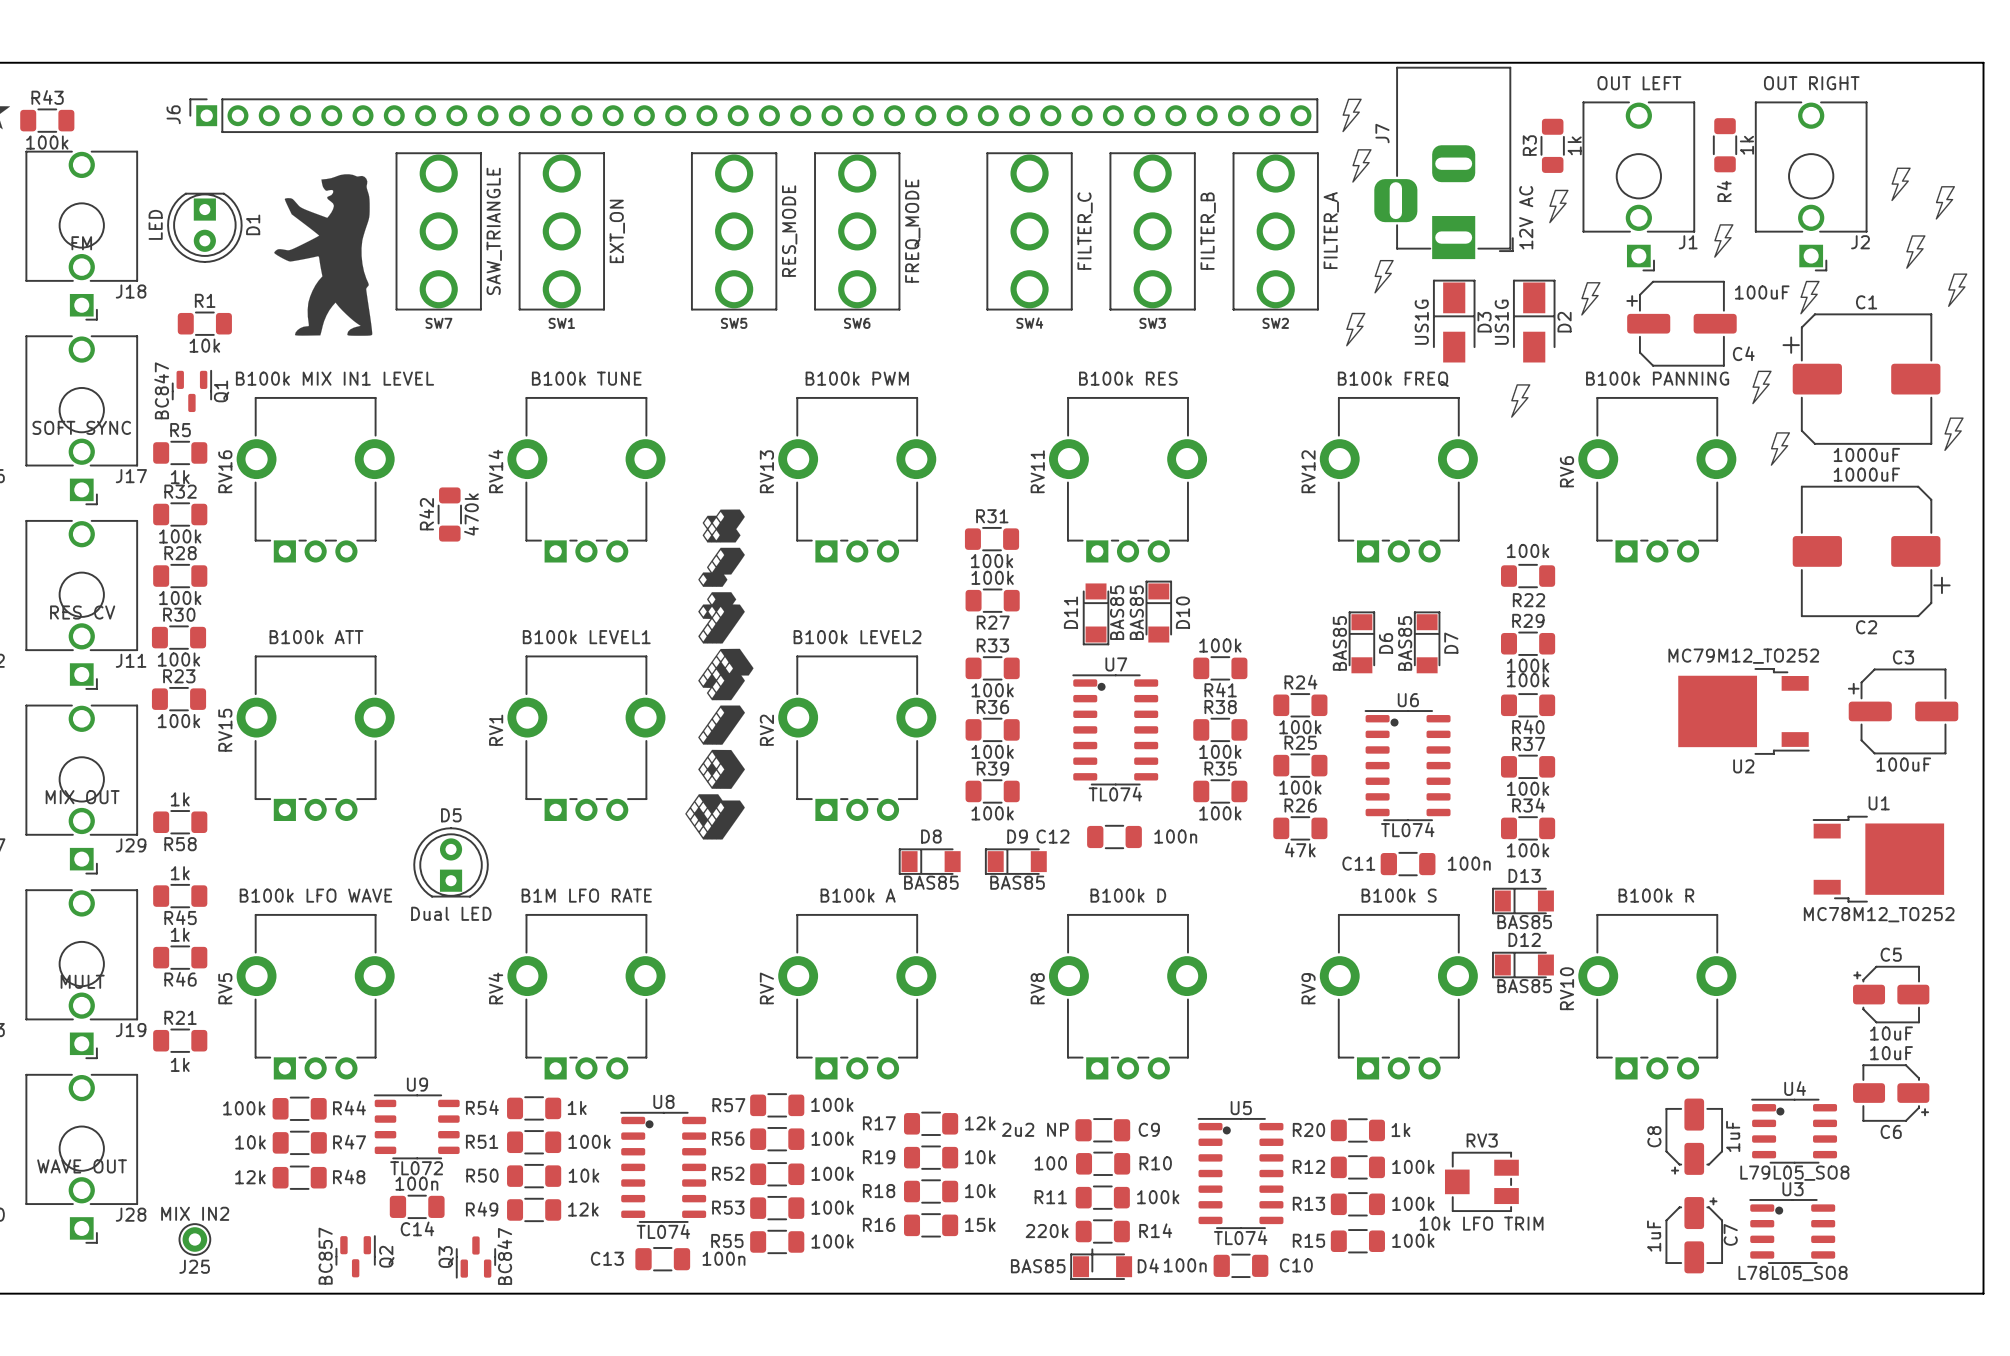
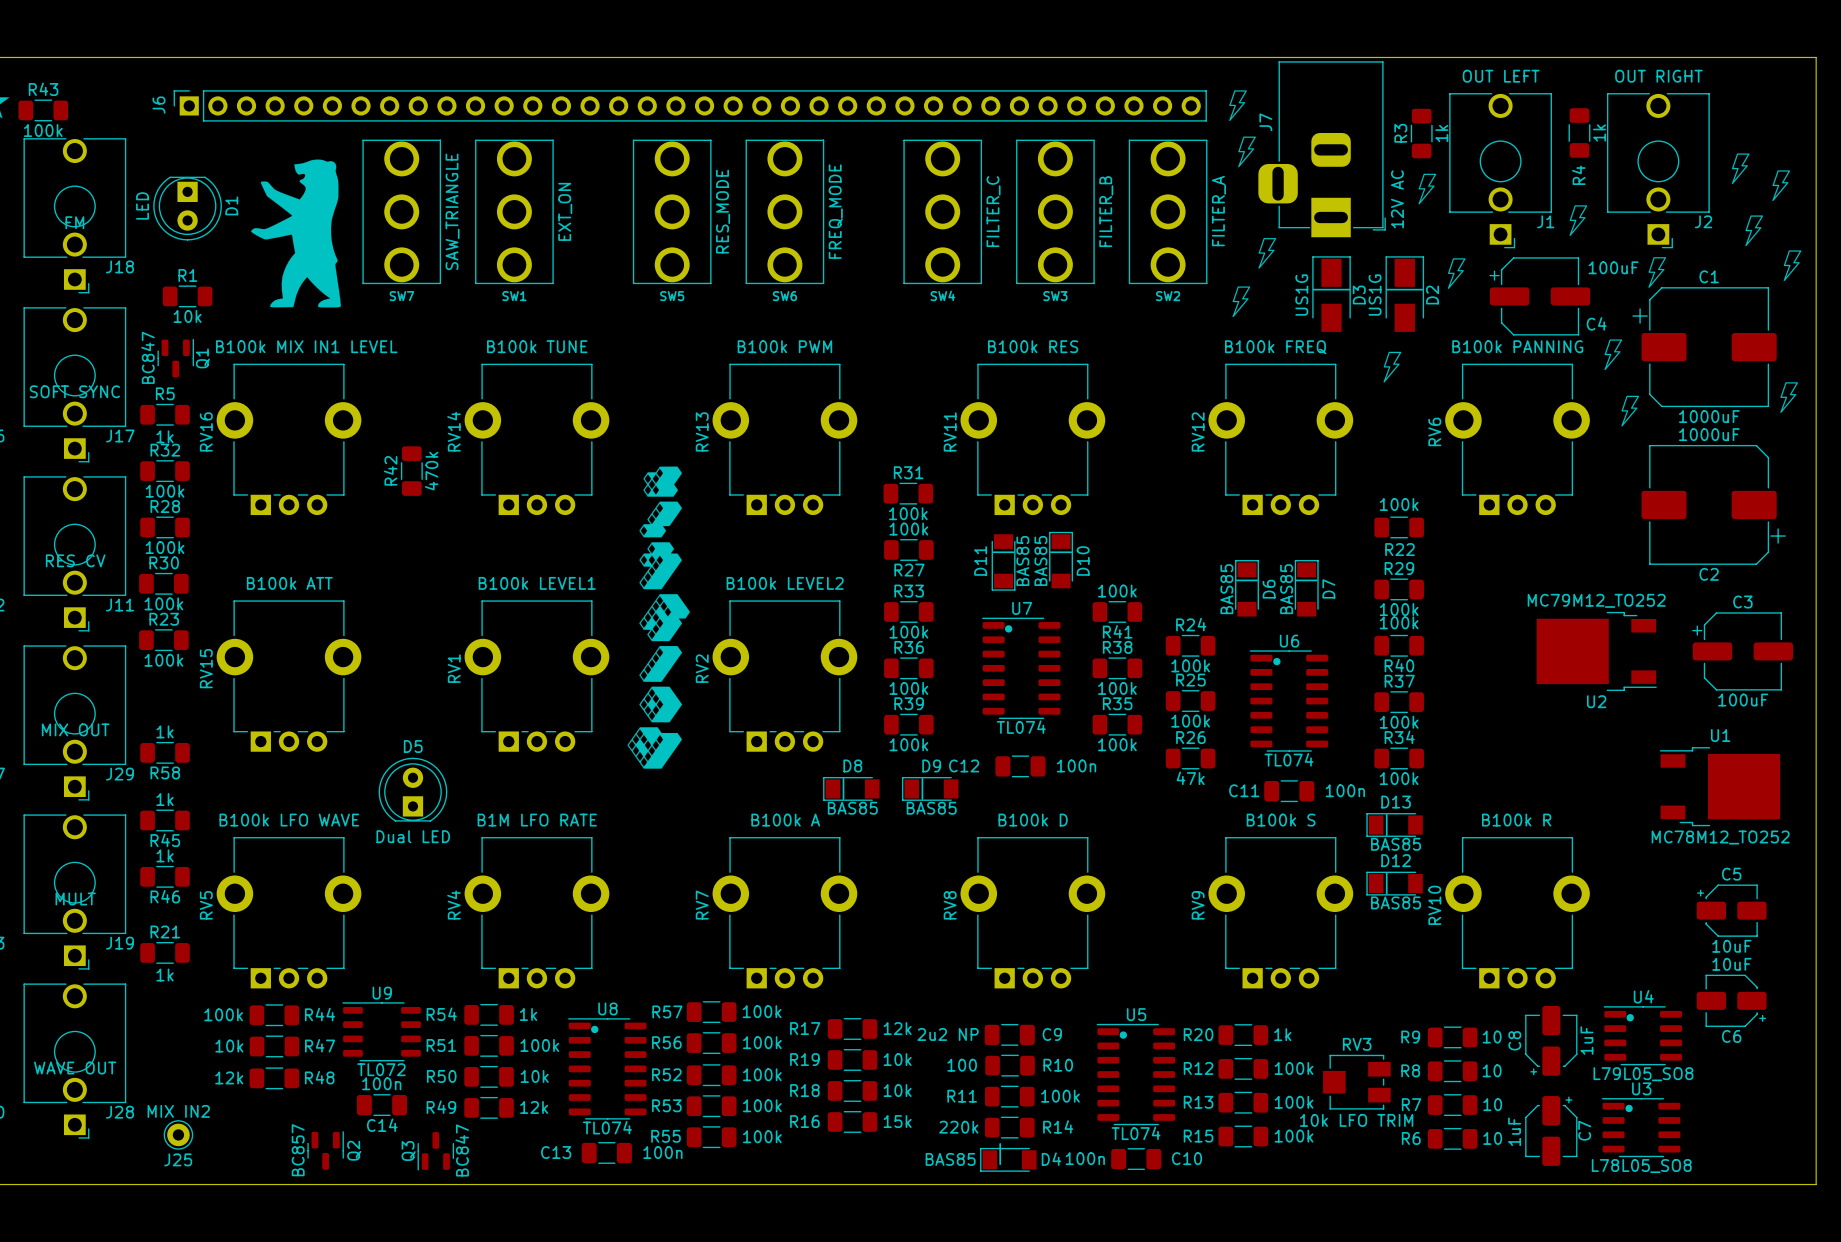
R9: none -> 10 (1452, 1037)
R8: none -> 10 (1452, 1071)
R7: none -> 10 (1452, 1105)
R6: none -> 10 (1452, 1138)

